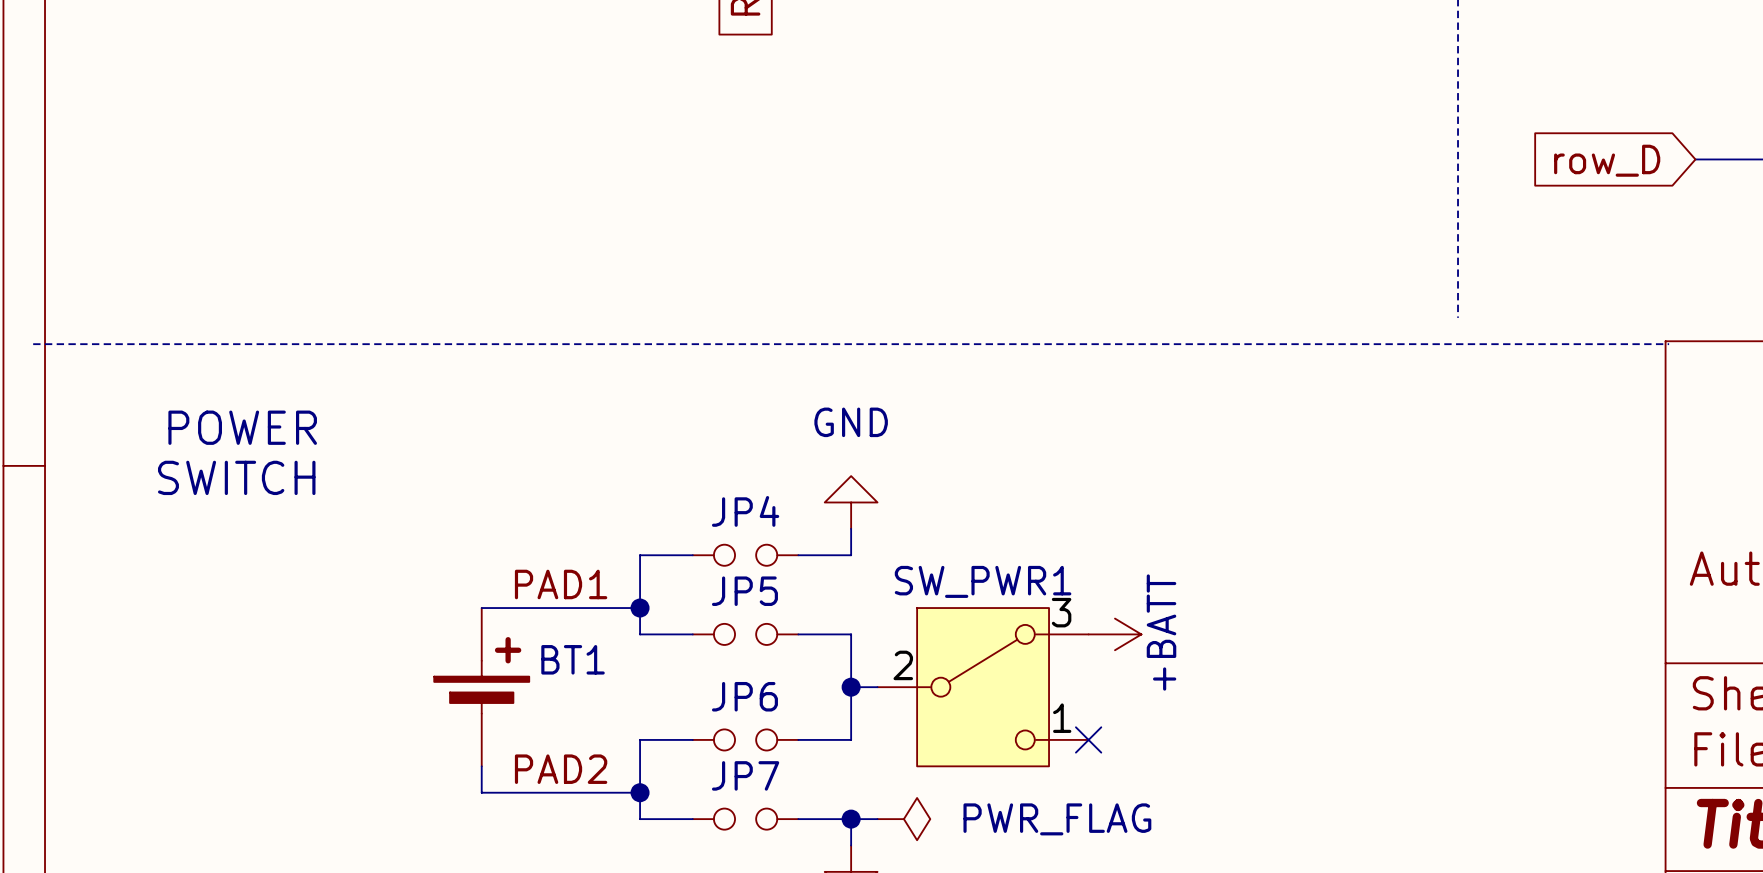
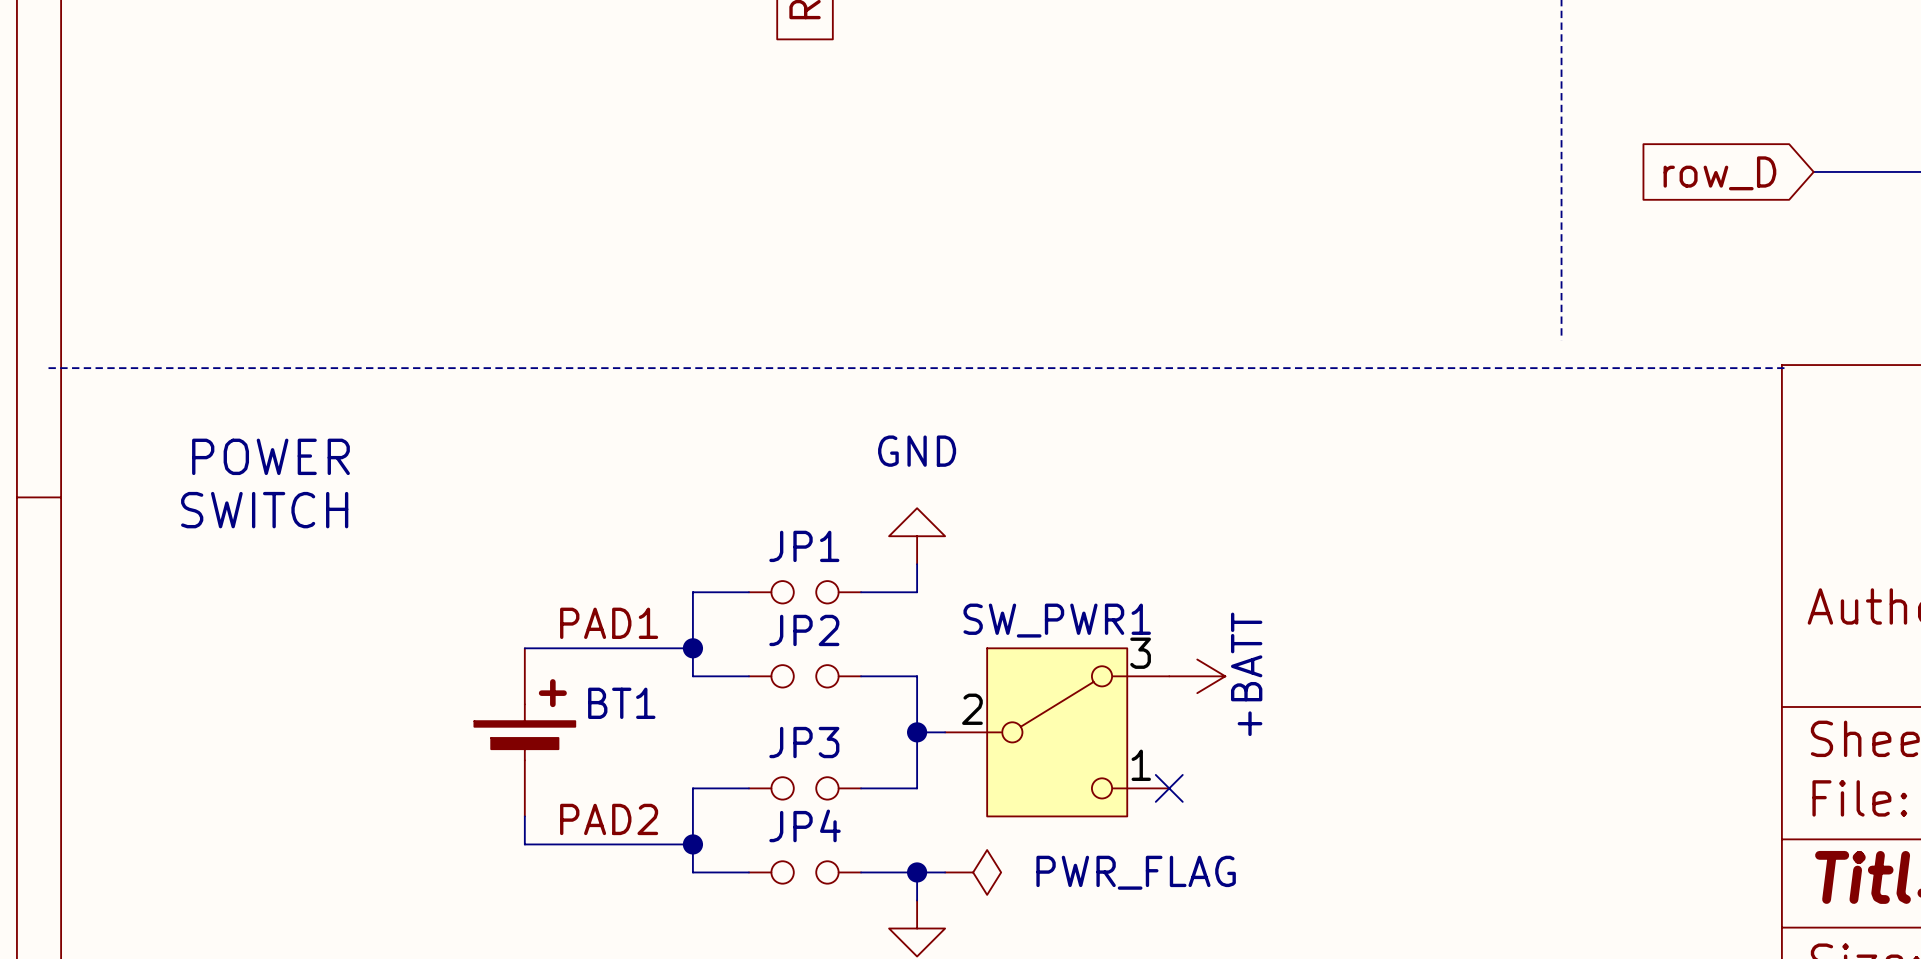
JP4 name: JP4 (745, 511) -> JP1 (804, 546)
JP5 name: JP5 (744, 591) -> JP2 (804, 630)
JP6 name: JP6 (744, 696) -> JP3 (804, 742)
JP7 name: JP7 (745, 775) -> JP4 (805, 825)

